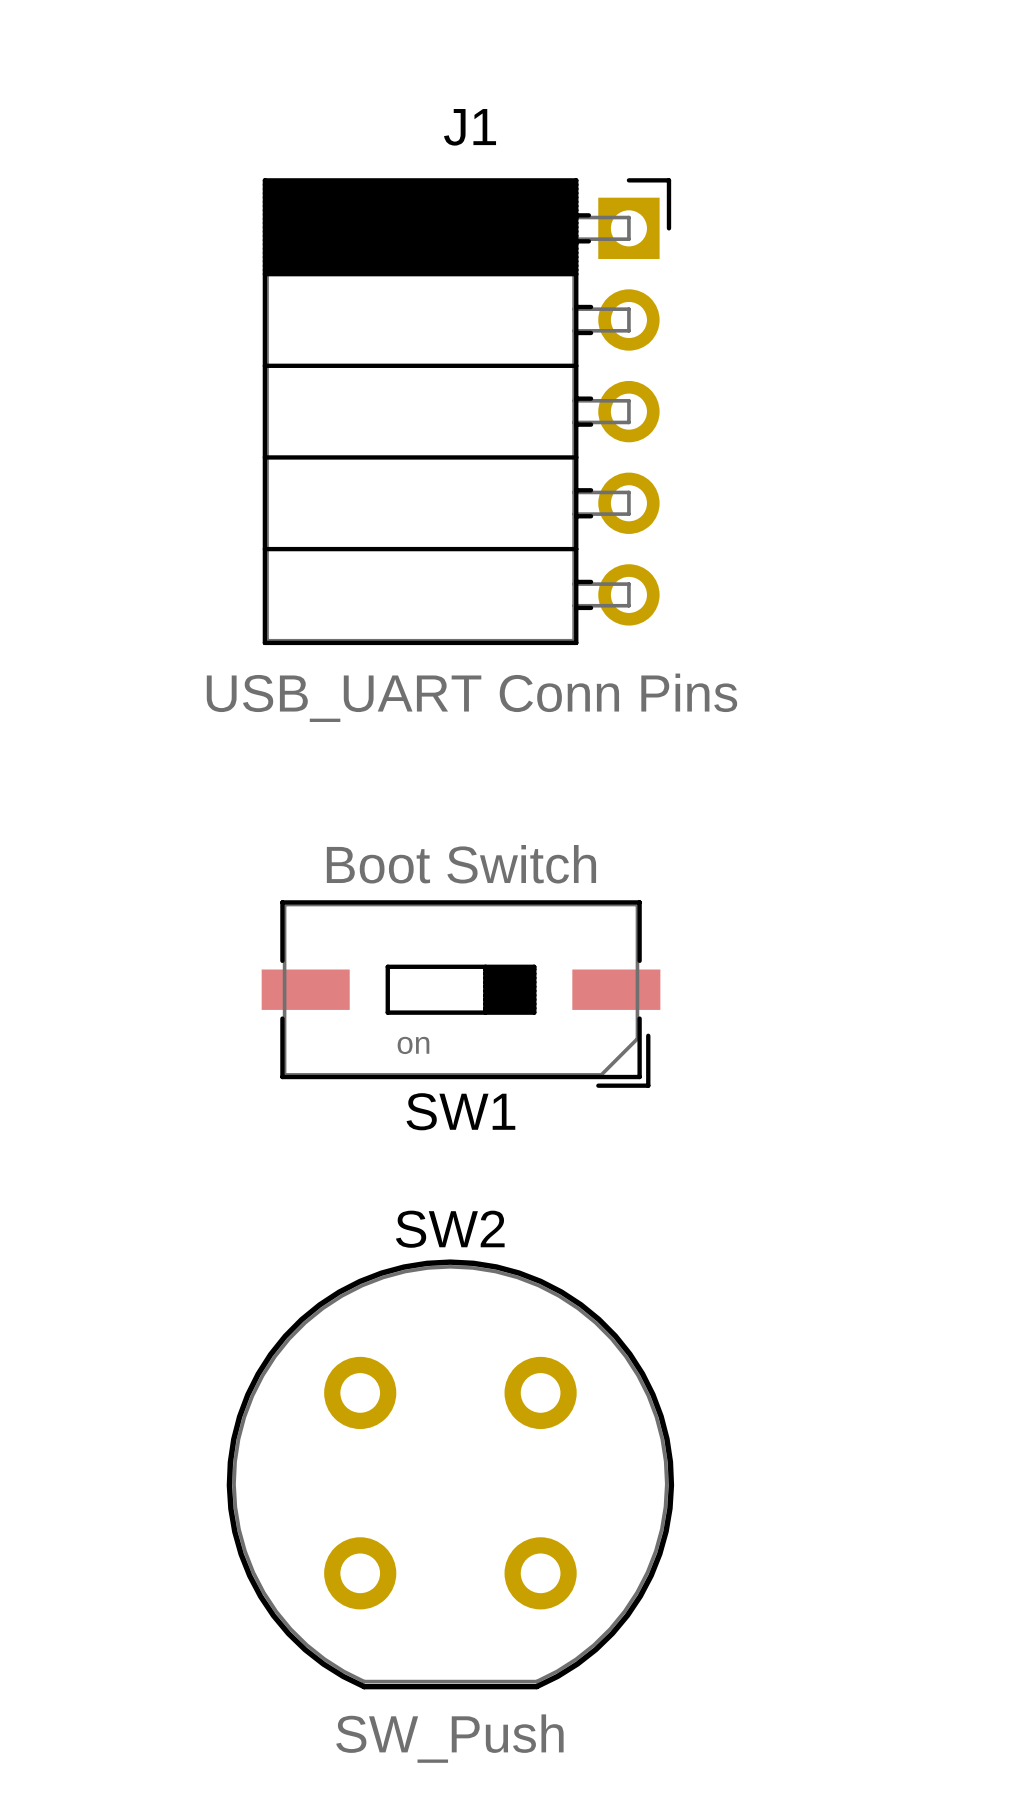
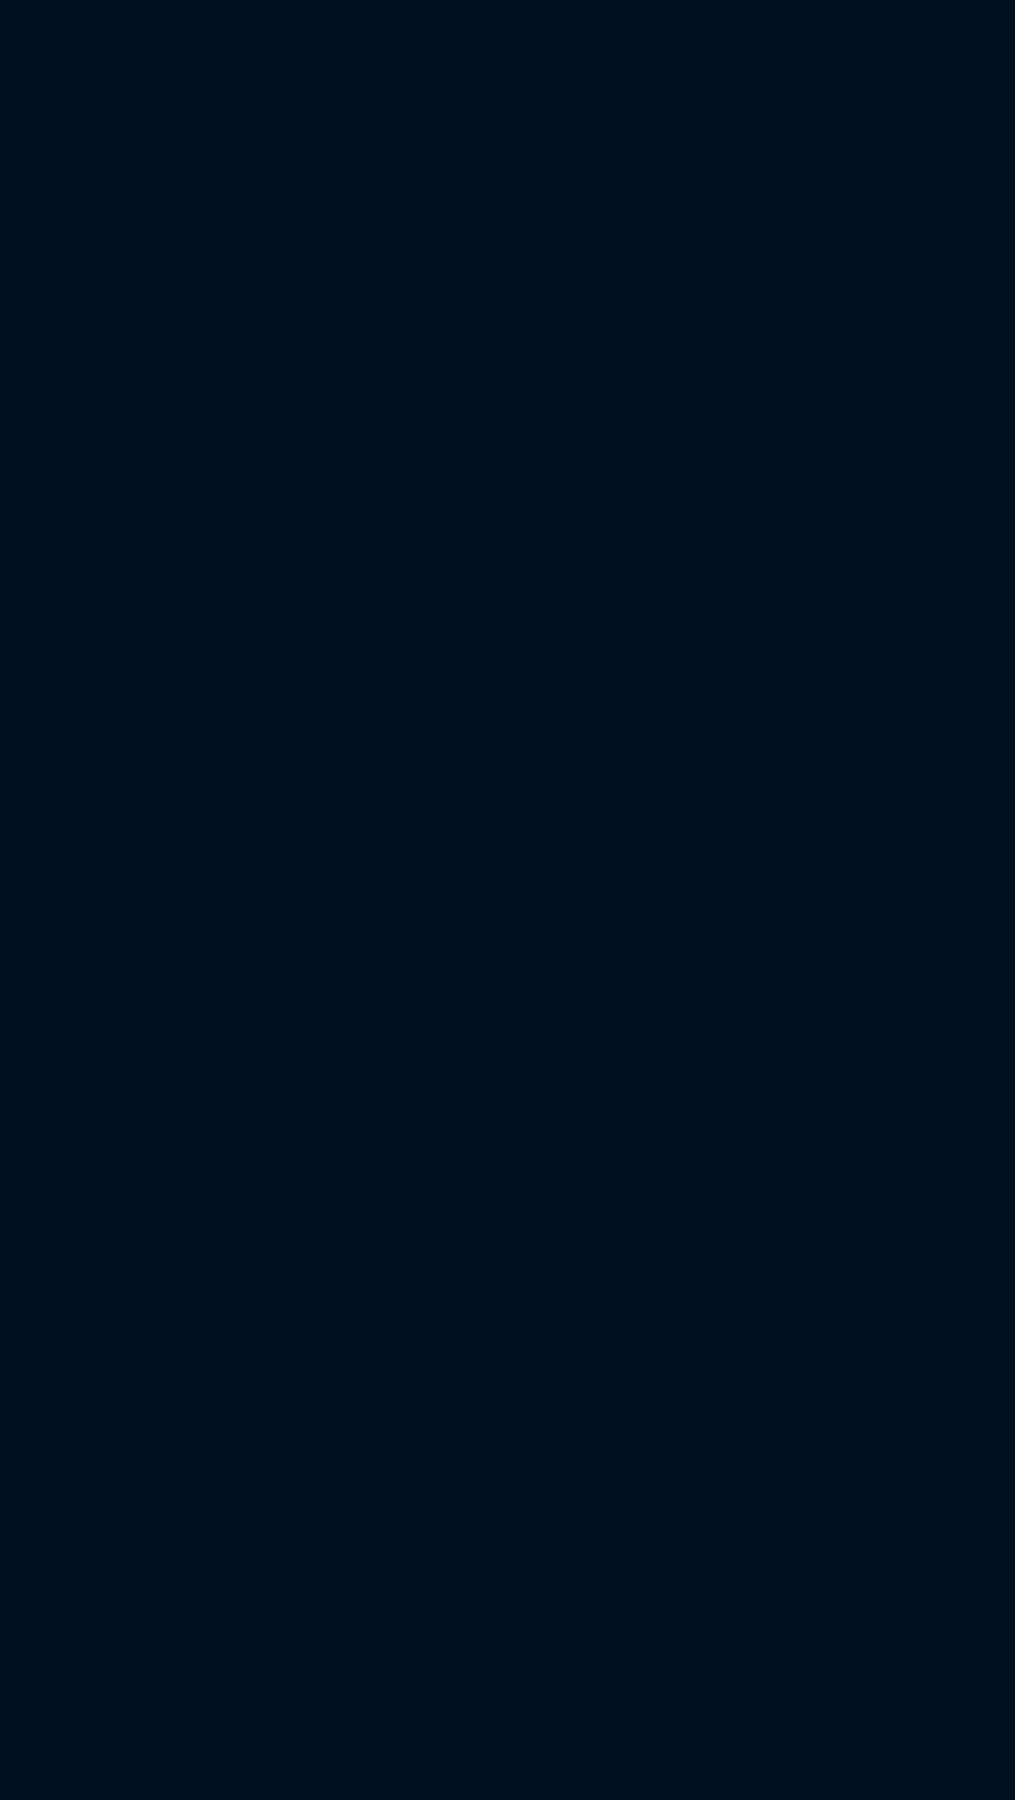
J1: USB_UART Conn Pins (466, 411) -> none
SW1: Boot Switch (461, 994) -> none
SW2: SW_Push (450, 1474) -> none

